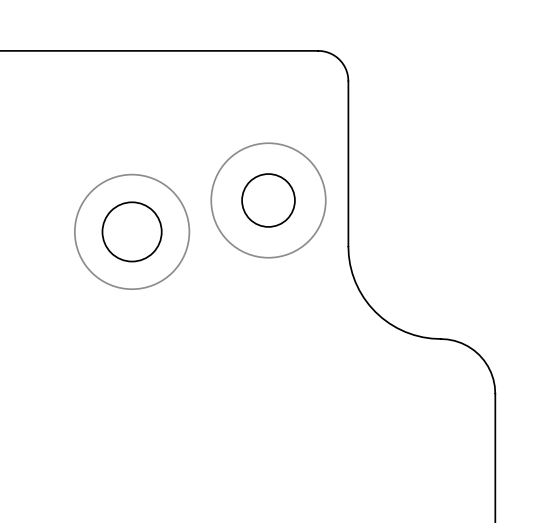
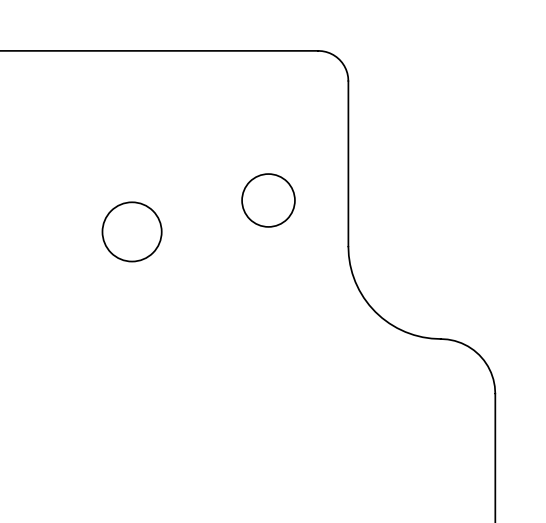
drawing: [210, 142, 327, 259] -> none
drawing: [74, 173, 191, 290] -> none

